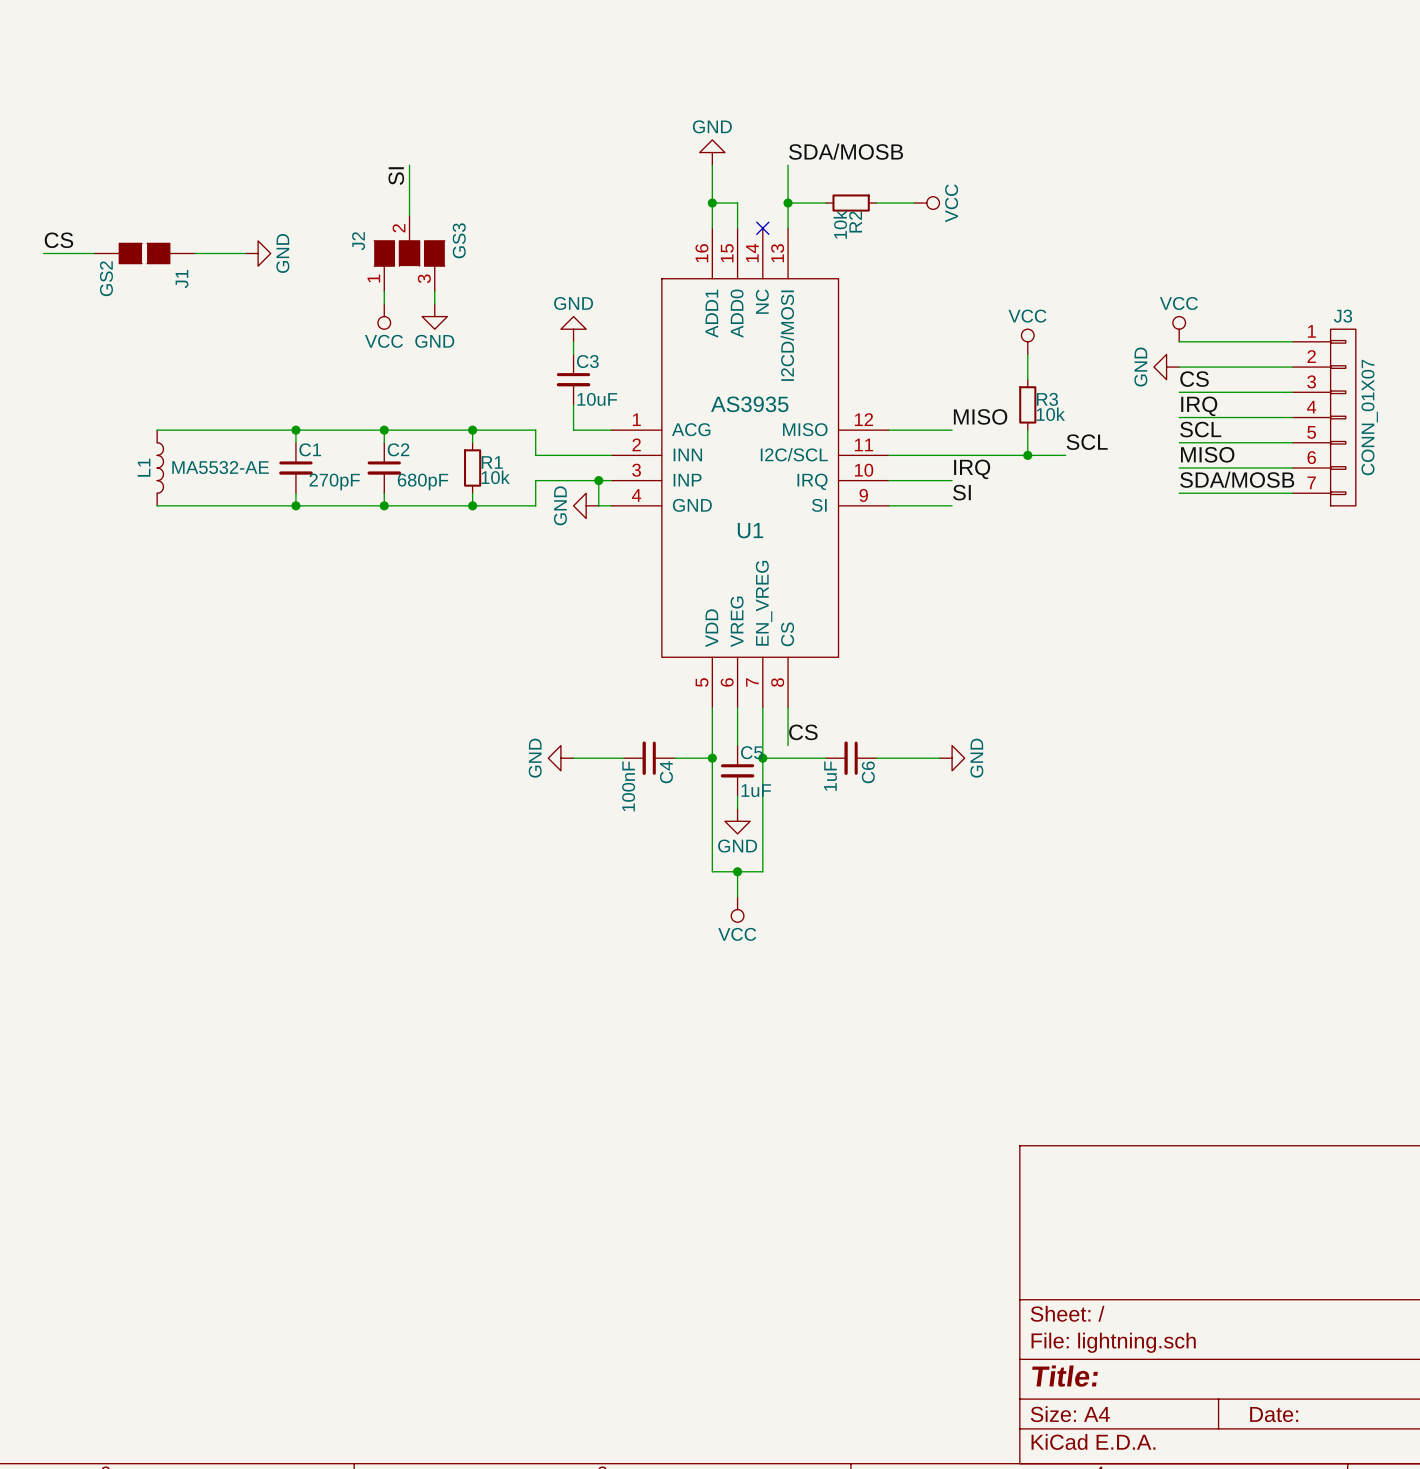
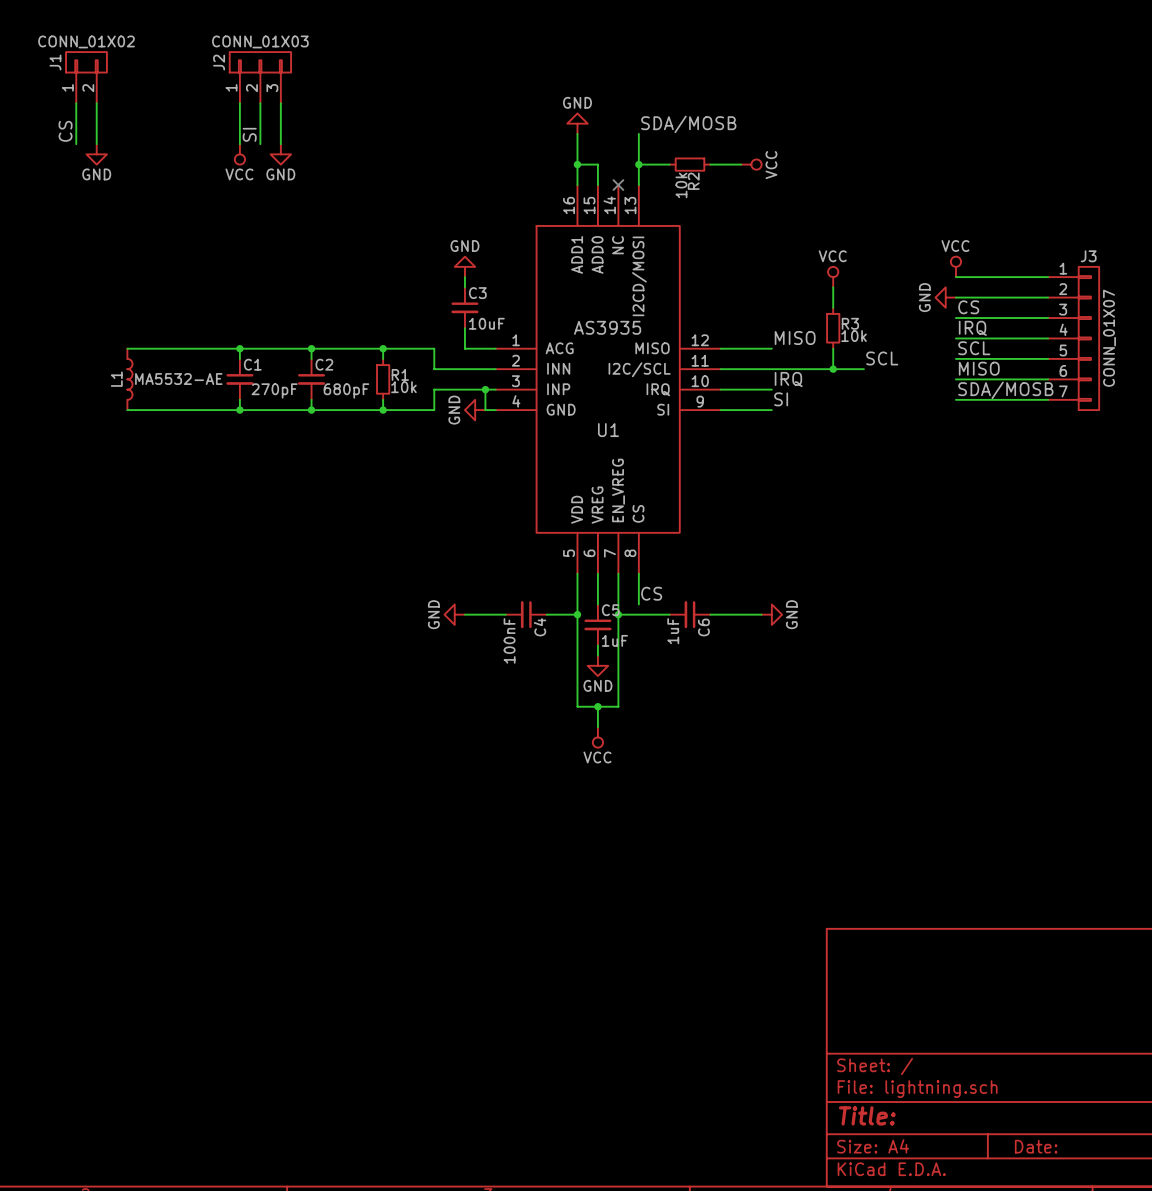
wire: none -> (76, 103) (76, 144)
wire: none -> (96, 103) (96, 144)
wire: none -> (239, 103) (239, 144)
wire: none -> (260, 103) (260, 144)
wire: (409, 165) (409, 215) -> (280, 103) (280, 144)
label position: SI (396, 176) -> SI (249, 134)
power symbol: none -> GND (96, 154)
power symbol: none -> GND (280, 154)
J2 symbol: [374, 215, 445, 292] -> [229, 52, 292, 104]
label rotation: 0° (58, 240) -> 90° counterclockwise (65, 131)
label position: CS (58, 240) -> CS (65, 131)
J2 value: GS3 (459, 240) -> CONN_01X03 (260, 41)
J1 symbol: [94, 243, 196, 264] -> [66, 52, 107, 104]
wire: (43, 253) (94, 253) -> none
wire: (195, 253) (245, 253) -> none
power symbol: GND (258, 253) -> none
J1 value: GS2 (106, 278) -> CONN_01X02 (86, 41)
J1 name position: J1 (182, 279) -> J1 (55, 62)
wire: (384, 291) (384, 303) -> none
wire: (434, 291) (434, 303) -> none
power symbol position: VCC (384, 316) -> VCC (239, 154)
power symbol: GND (434, 316) -> none

